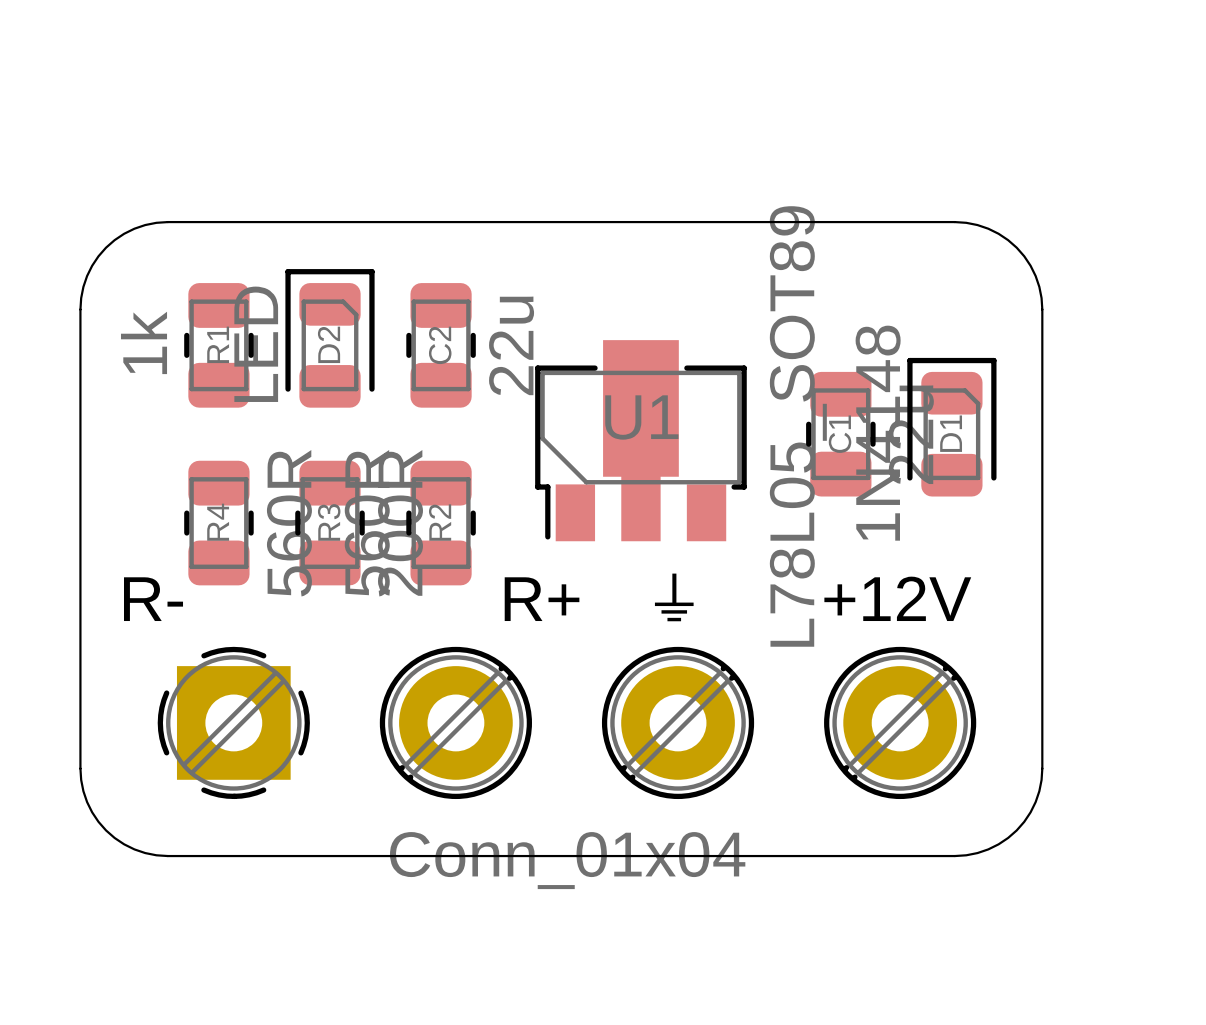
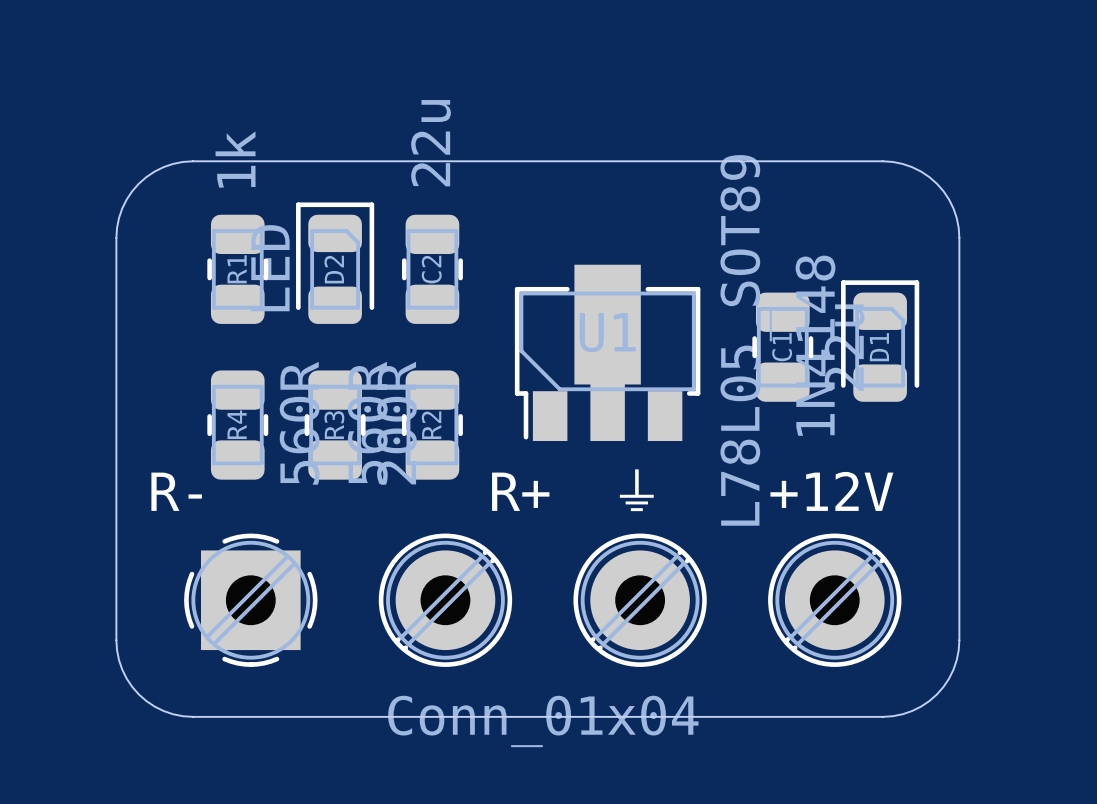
R1 value position: 1k (144, 342) -> 1k (235, 159)
C2 value position: 22u (511, 345) -> 22u (431, 143)

